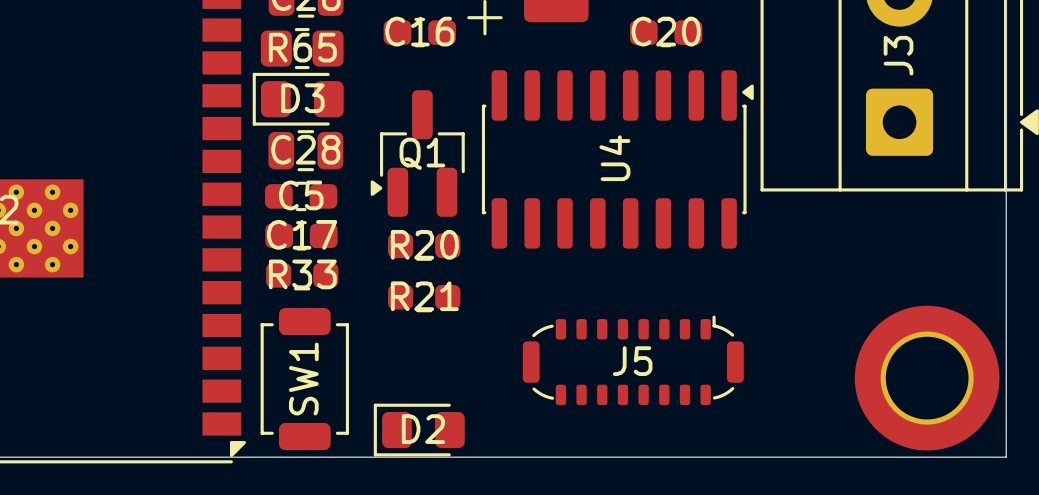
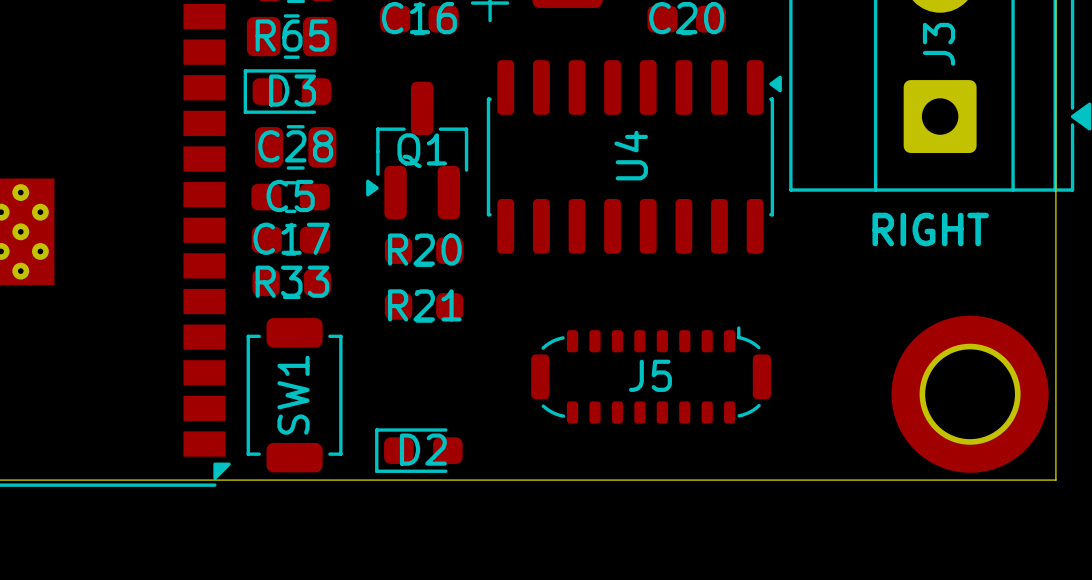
D3 footprint: [252, 72, 344, 126] -> [243, 69, 332, 114]
text: none -> RIGHT (930, 229)
D2 footprint: [373, 403, 465, 457] -> [375, 428, 463, 473]

